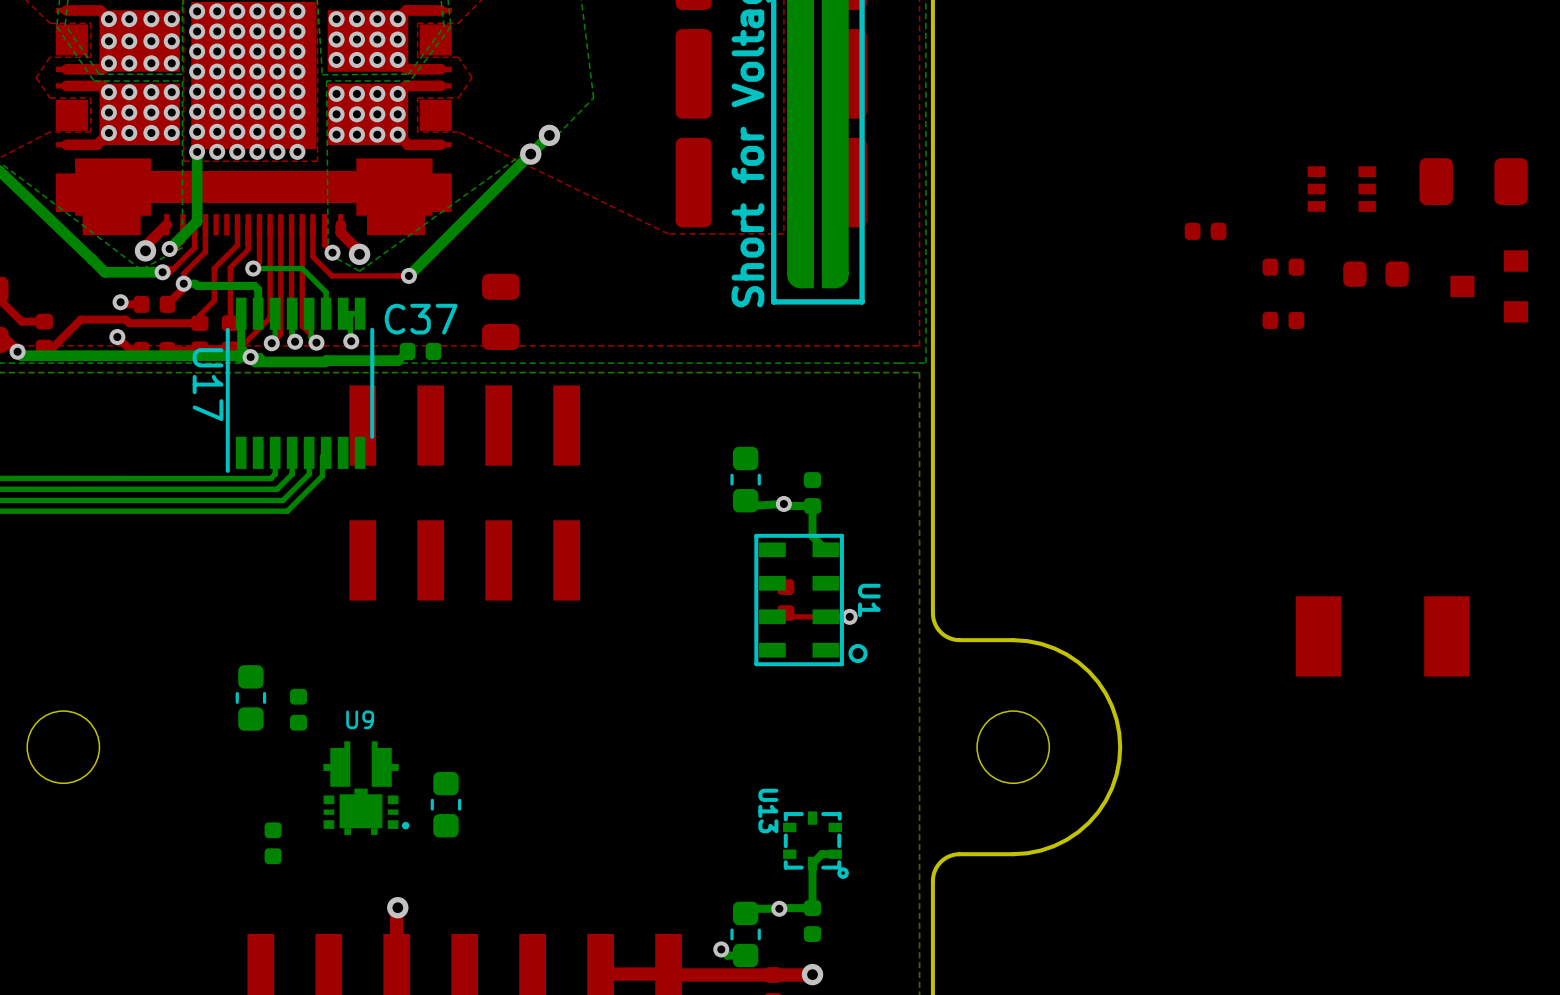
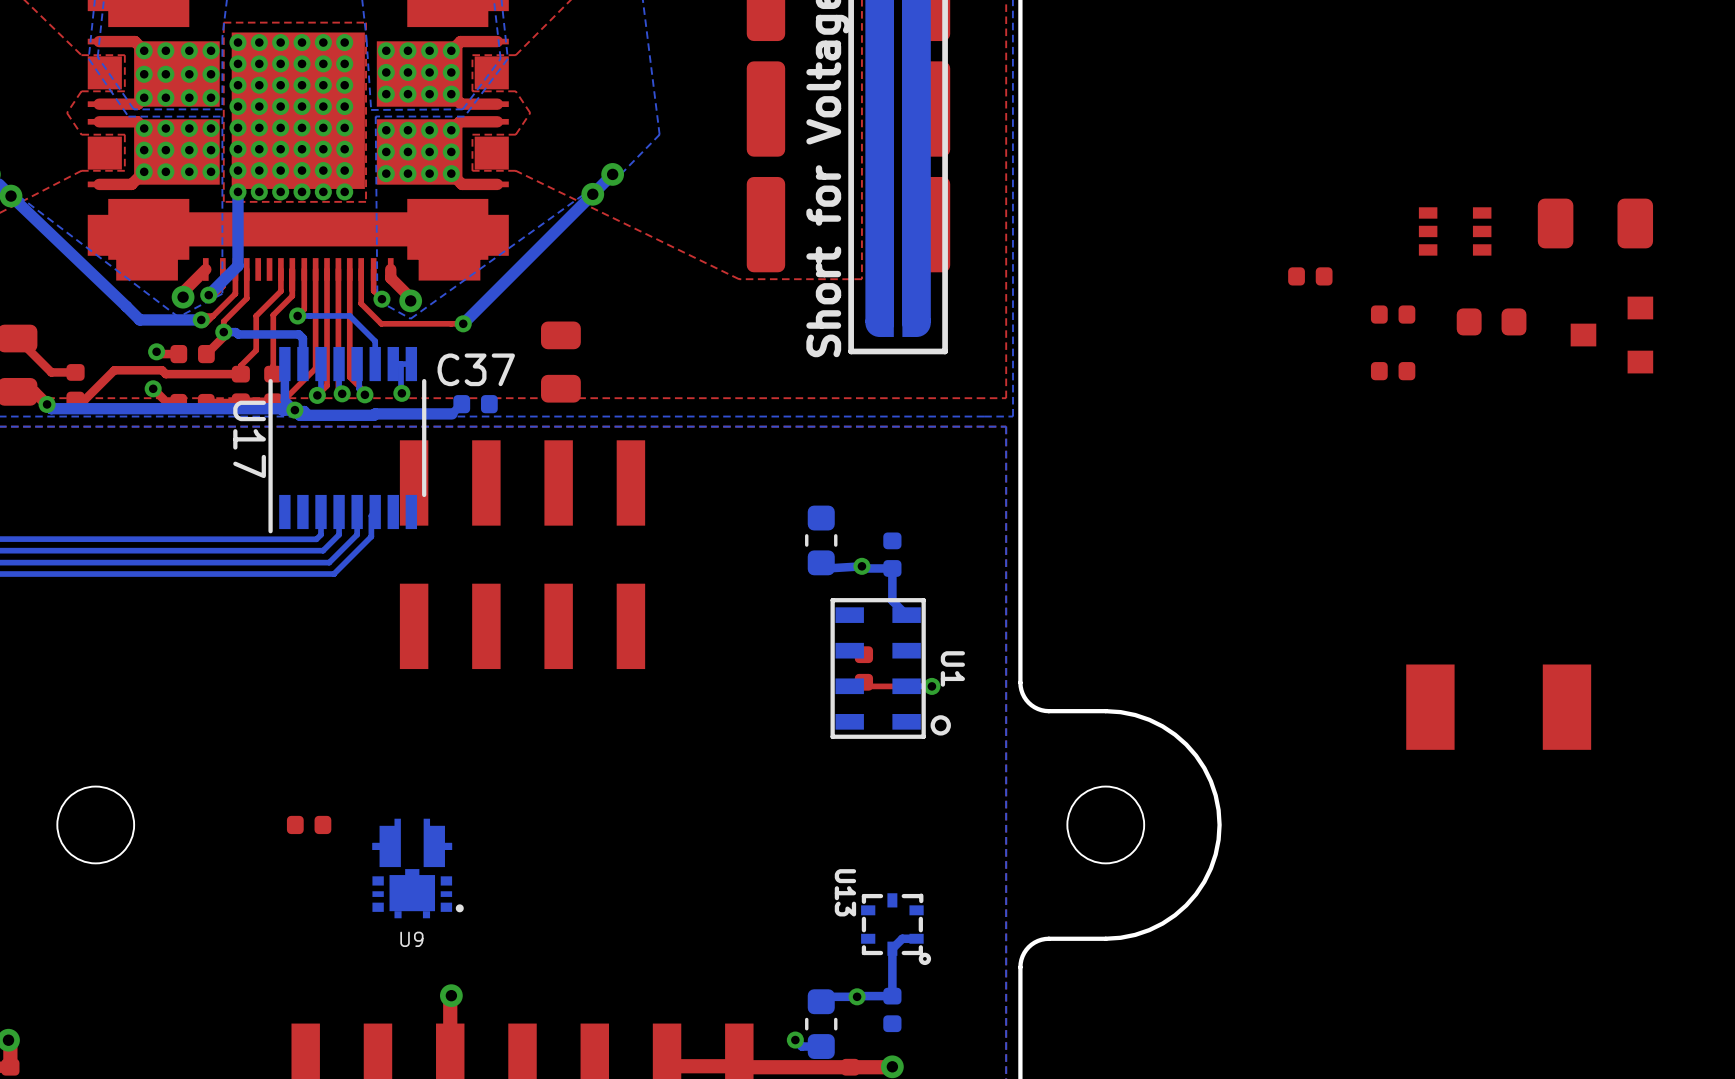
part: (250, 697) -> none
part: (298, 709) -> none
U9 name position: U9 (360, 719) -> U9 (411, 939)
part: (445, 804) -> none
part side: bottom (273, 843) -> top (309, 824)

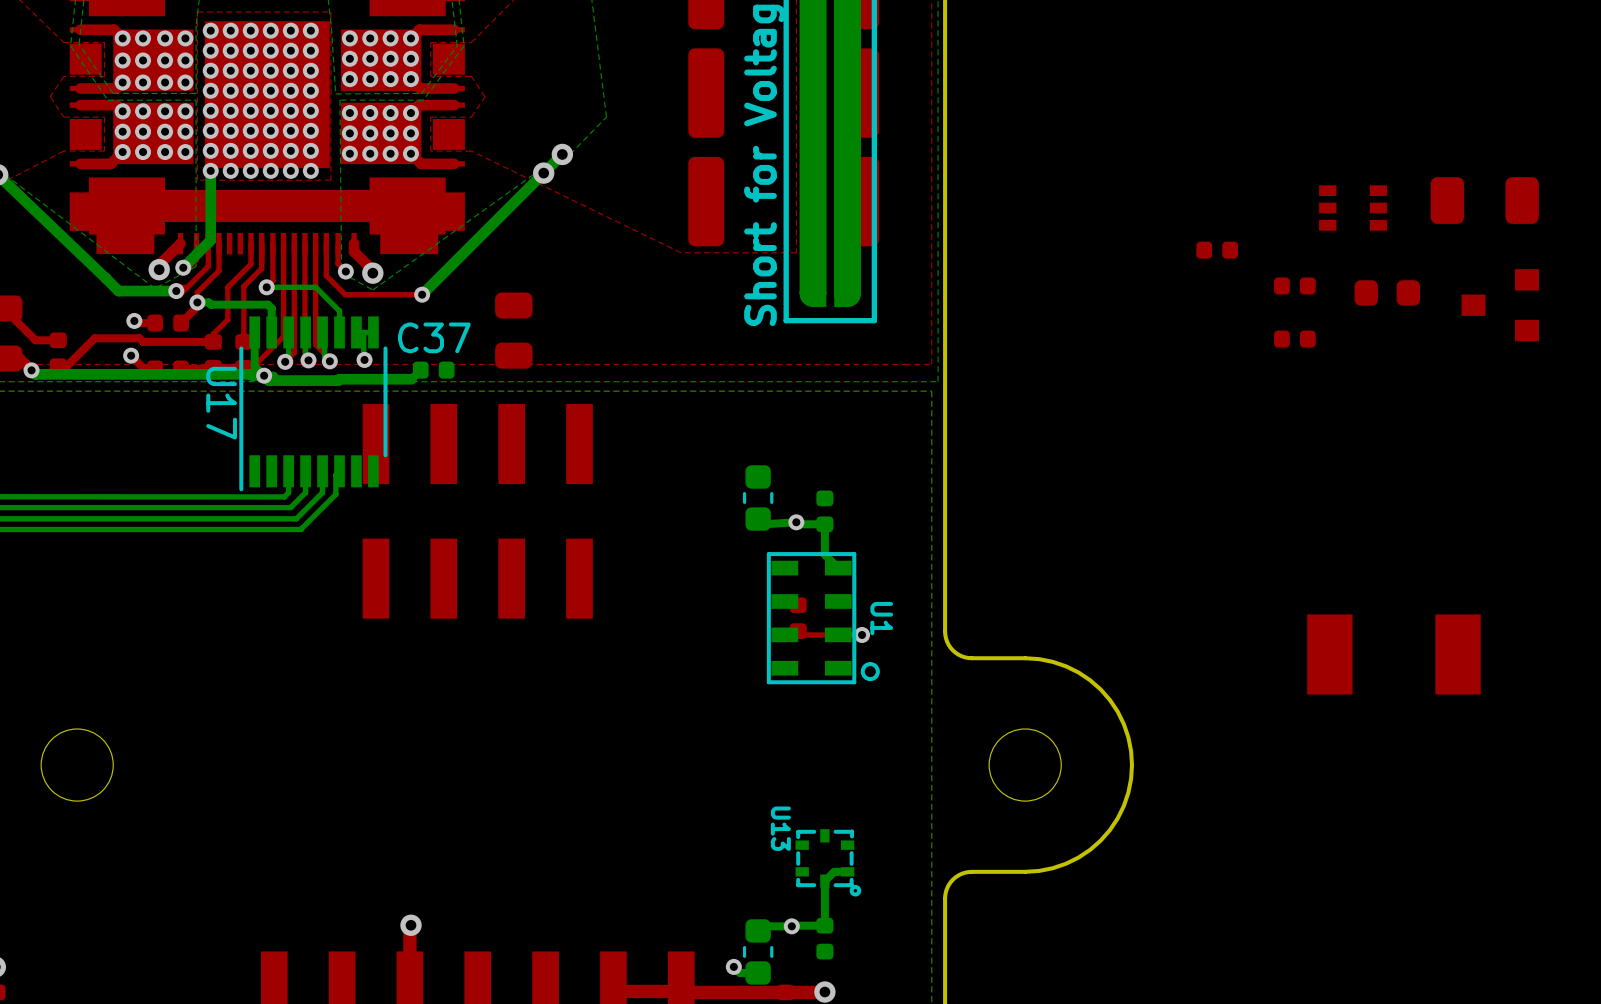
part: (309, 824) -> none
U9: (418, 868) -> none

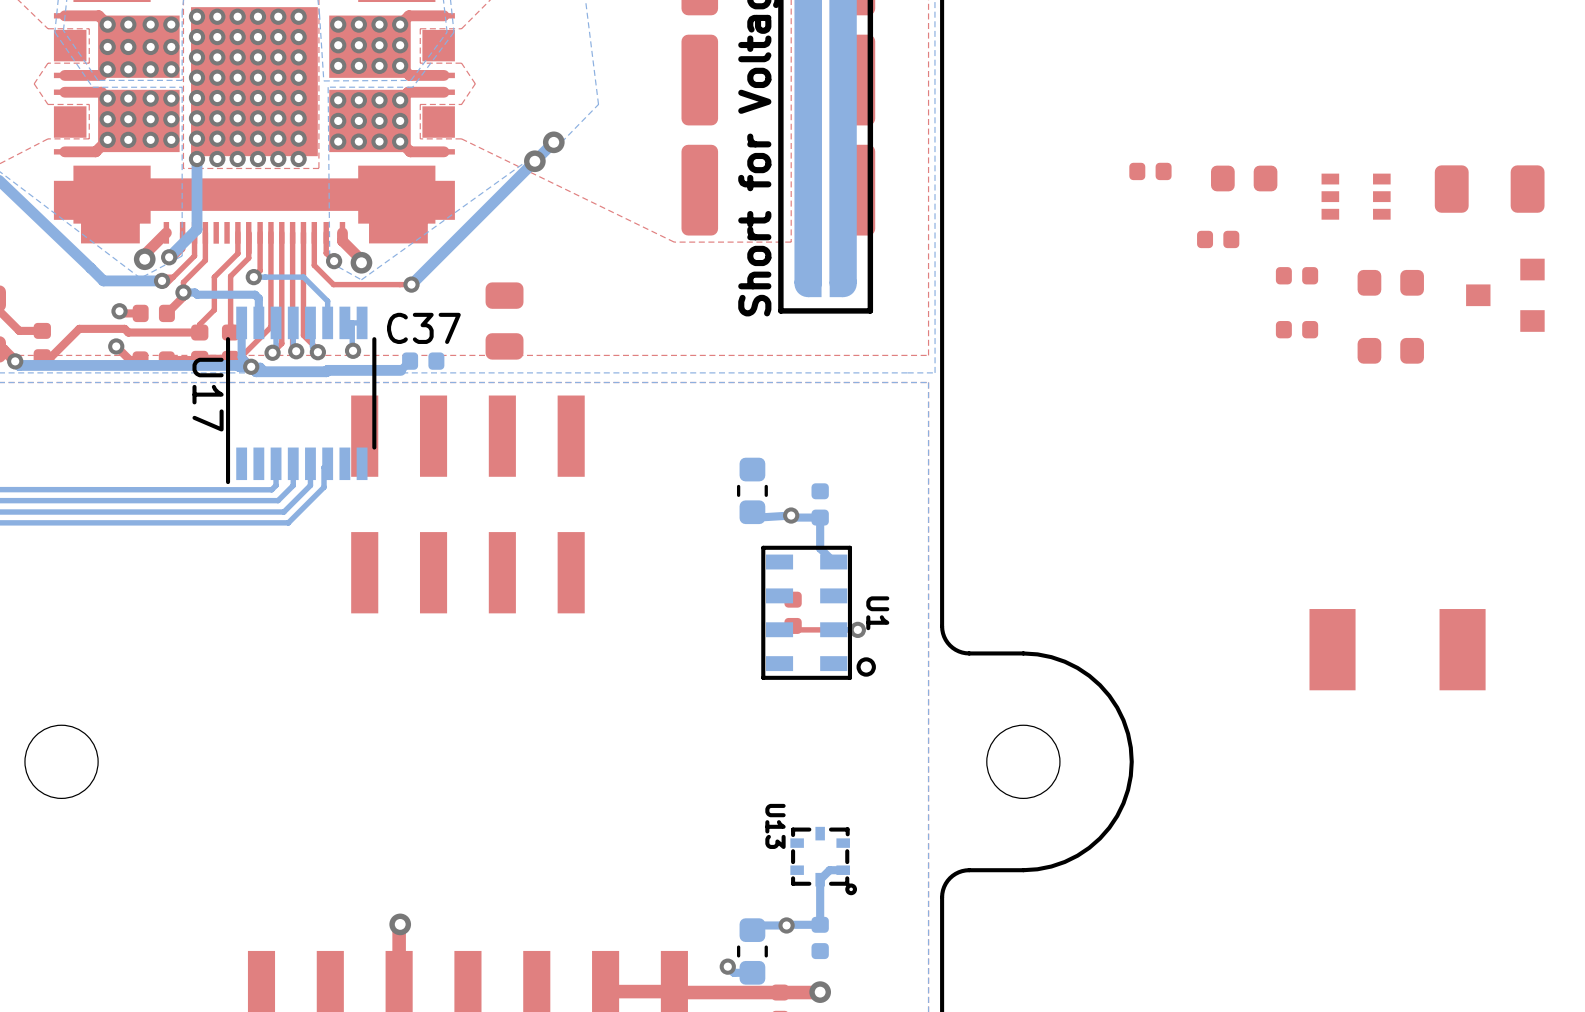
part: none -> (1150, 171)
part: none -> (1244, 178)
part: none -> (1390, 350)

